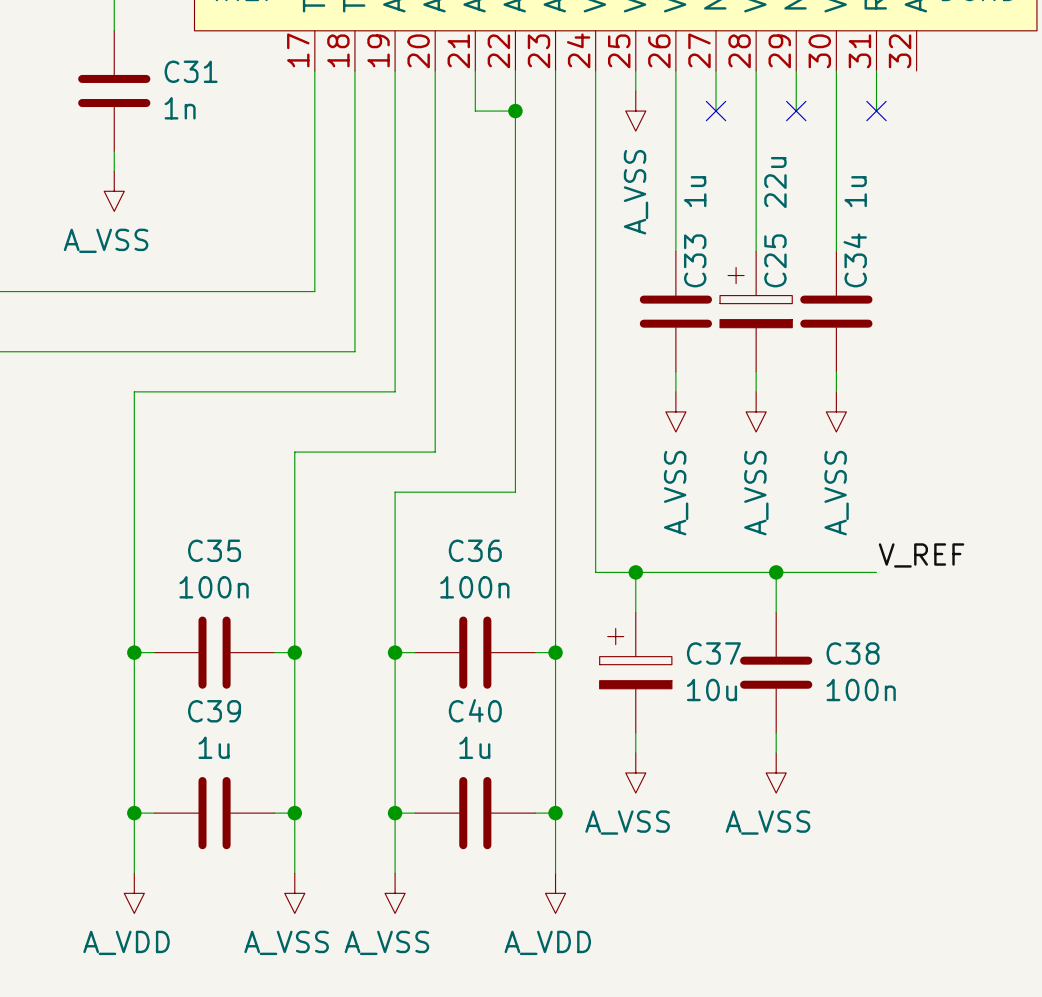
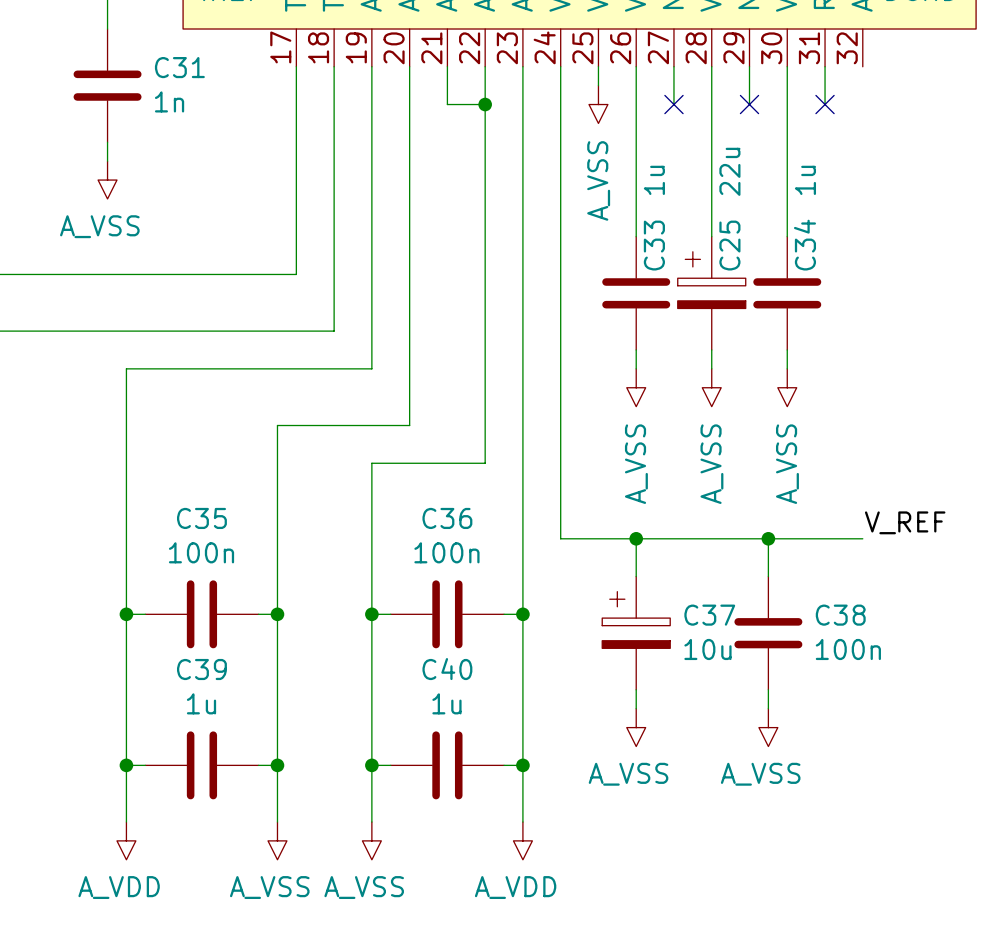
label position: V_REF (921, 555) -> V_REF (905, 522)
wire: (635, 572) (635, 612) -> (636, 538) (636, 576)
junction position: (635, 572) -> (636, 538)
wire: (776, 572) (776, 612) -> (768, 538) (768, 576)
junction position: (776, 572) -> (768, 538)
wire: none -> (825, 538) (862, 538)
C37 position: (635, 672) -> (636, 633)
C38 position: (776, 672) -> (768, 633)
wire: (635, 732) (635, 752) -> (636, 689) (636, 708)
wire: (776, 732) (776, 752) -> (768, 689) (768, 708)
power symbol position: A_VSS (635, 772) -> A_VSS (636, 727)
power symbol position: A_VSS (776, 772) -> A_VSS (768, 727)

